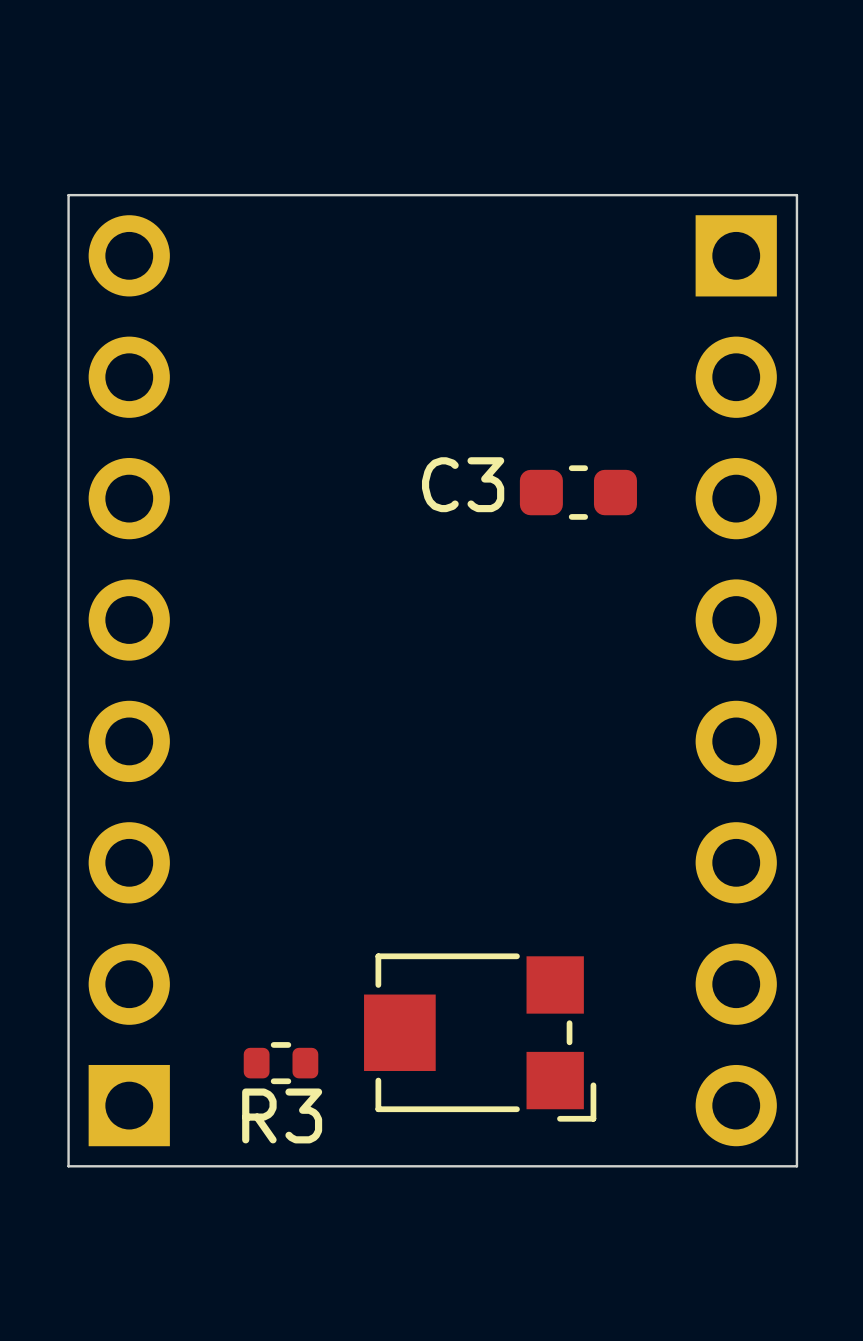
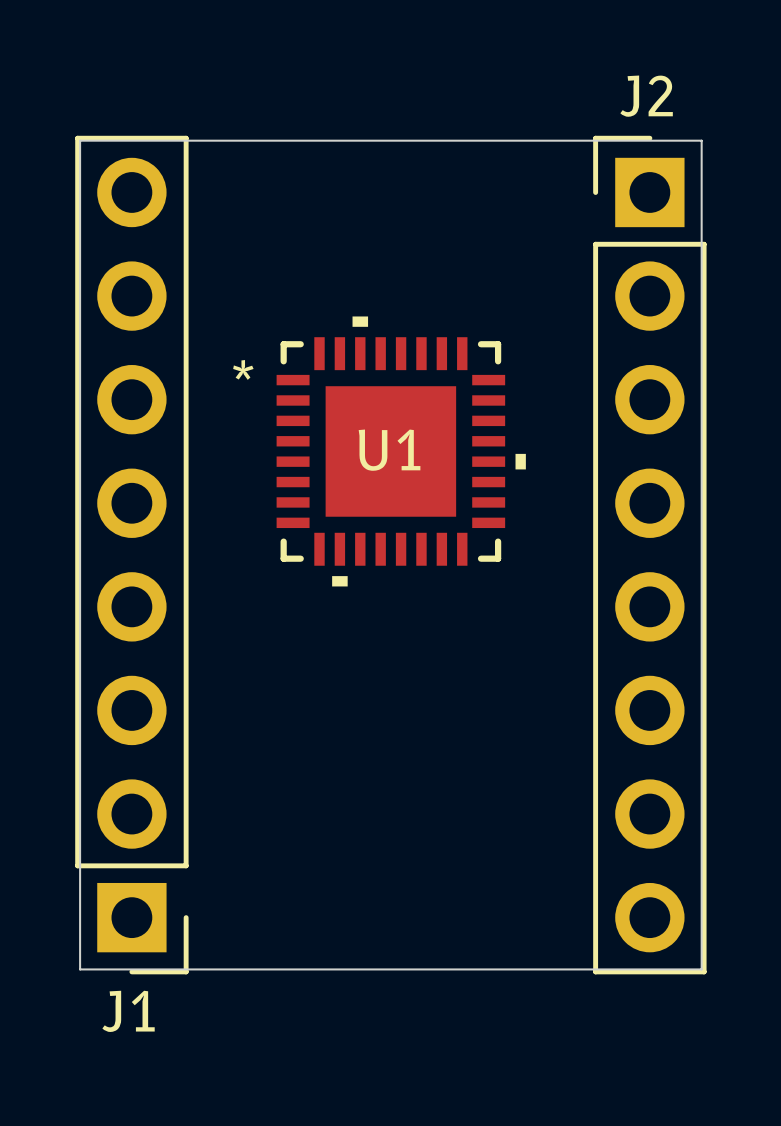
C3: (578, 492) -> none
U1: none -> (401, 451)
J1 side: bottom (129, 680) -> top (131, 555)
J2 side: bottom (736, 680) -> top (649, 555)
part: (480, 1037) -> none
R3: (281, 1063) -> none

